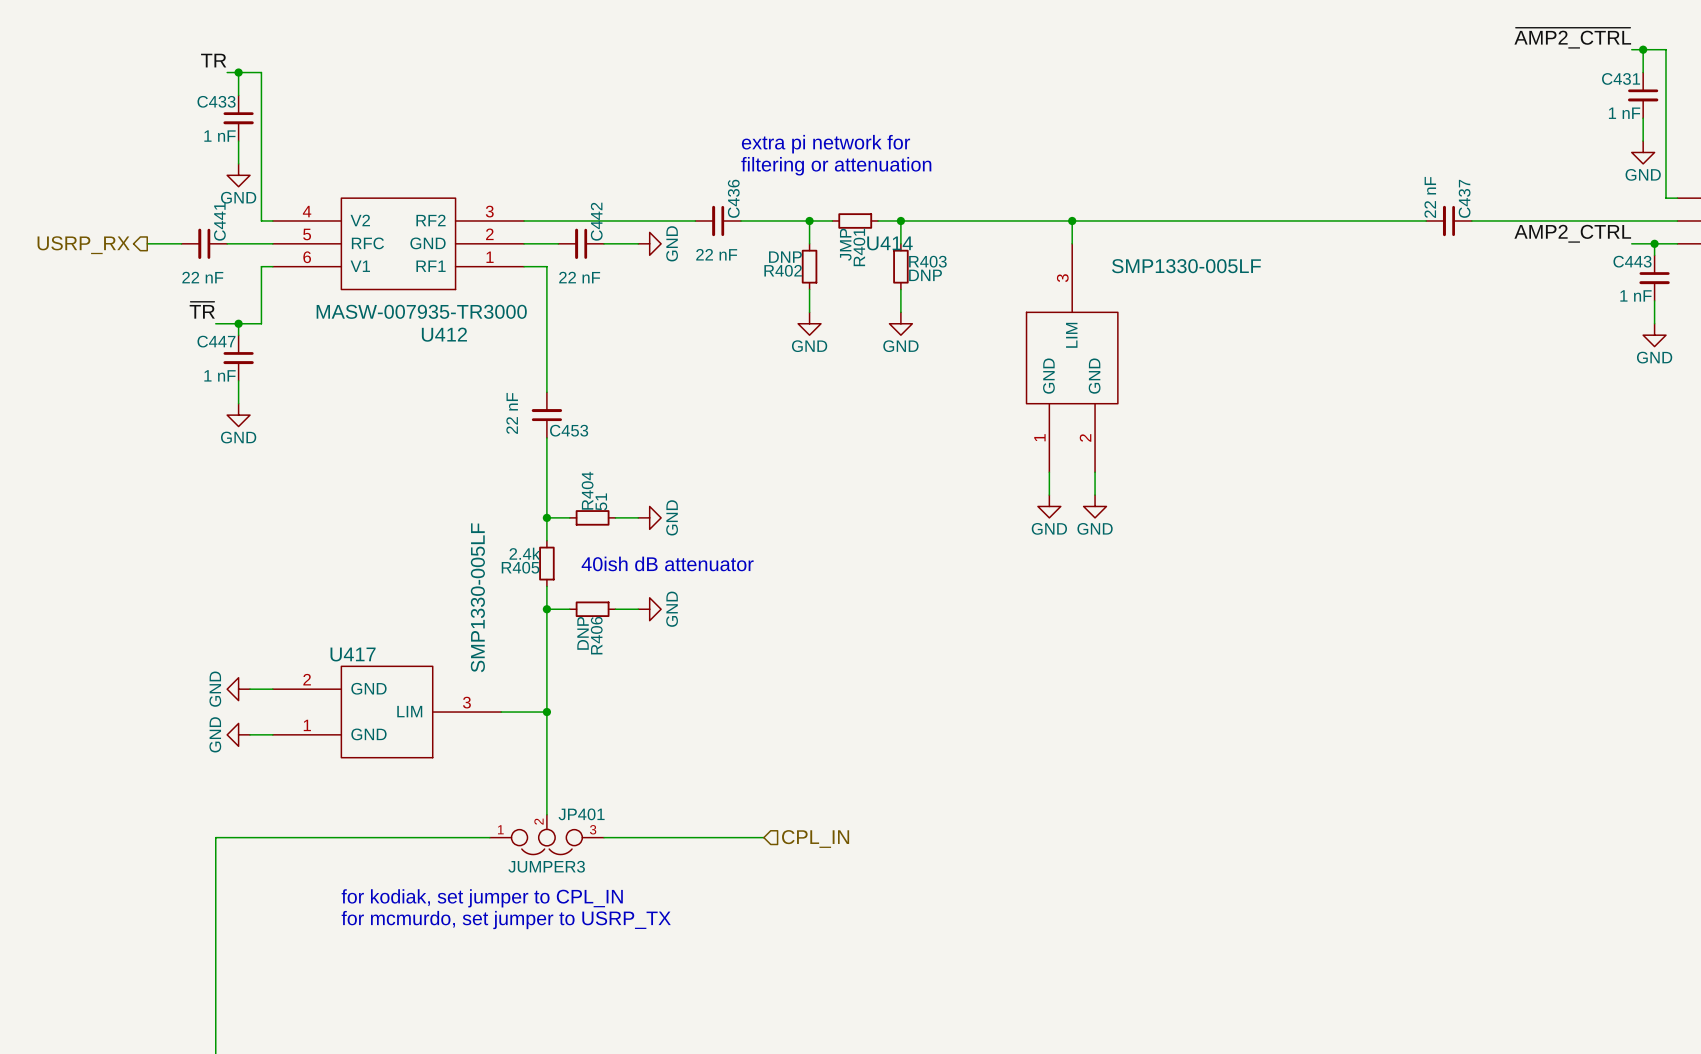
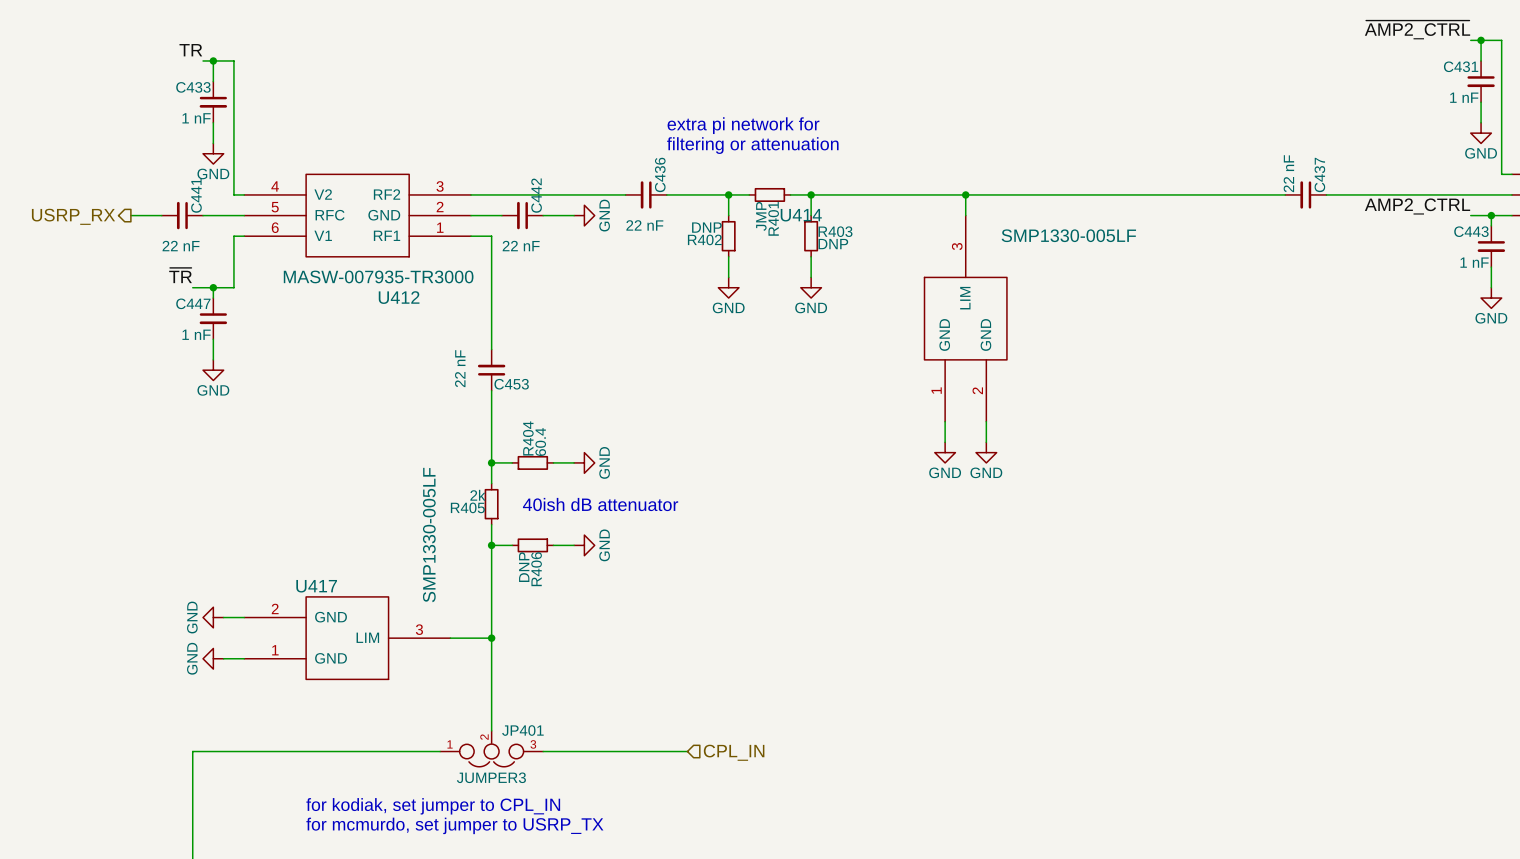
R404 value: 51 (601, 501) -> 60.4 (540, 442)
R405 value: 2.4k (524, 553) -> 2k (477, 495)

